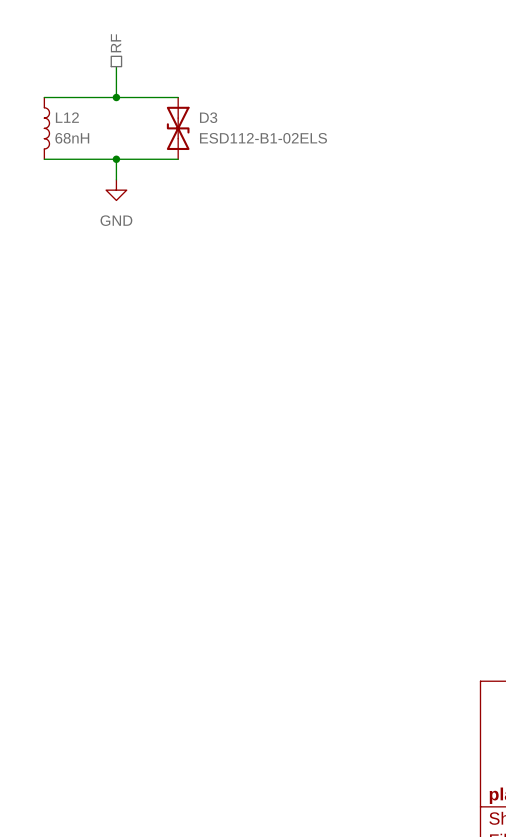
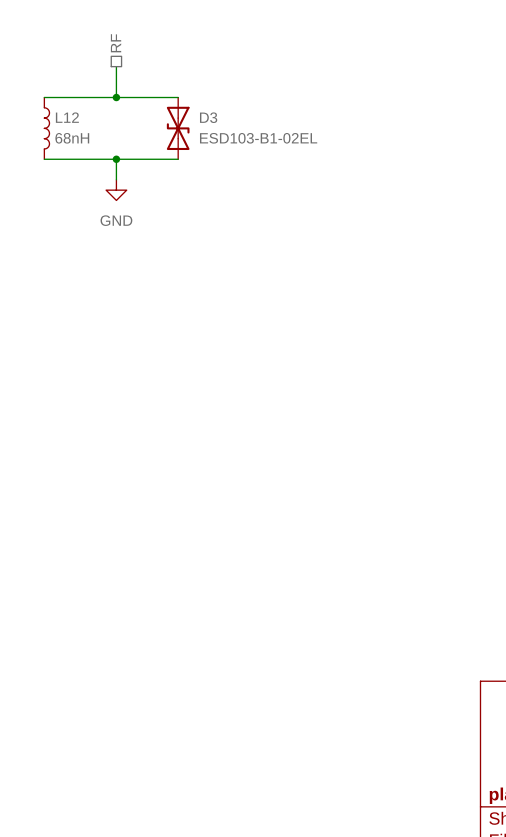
D3 value: ESD112-B1-02ELS (263, 138) -> ESD103-B1-02EL (258, 138)

